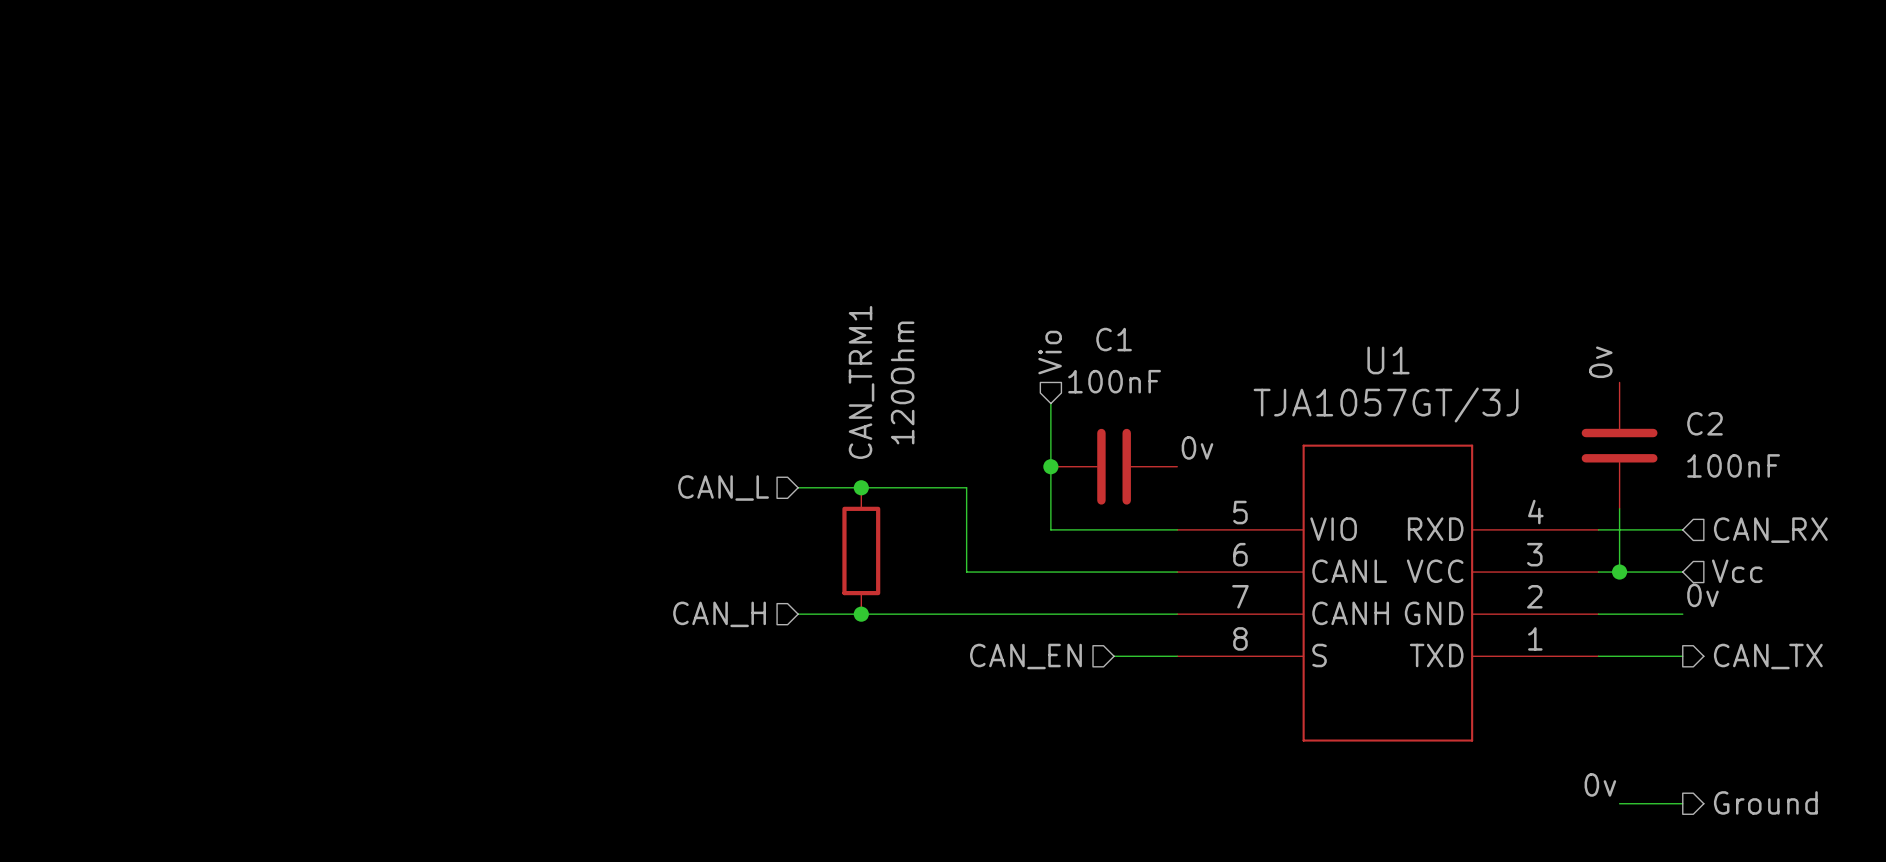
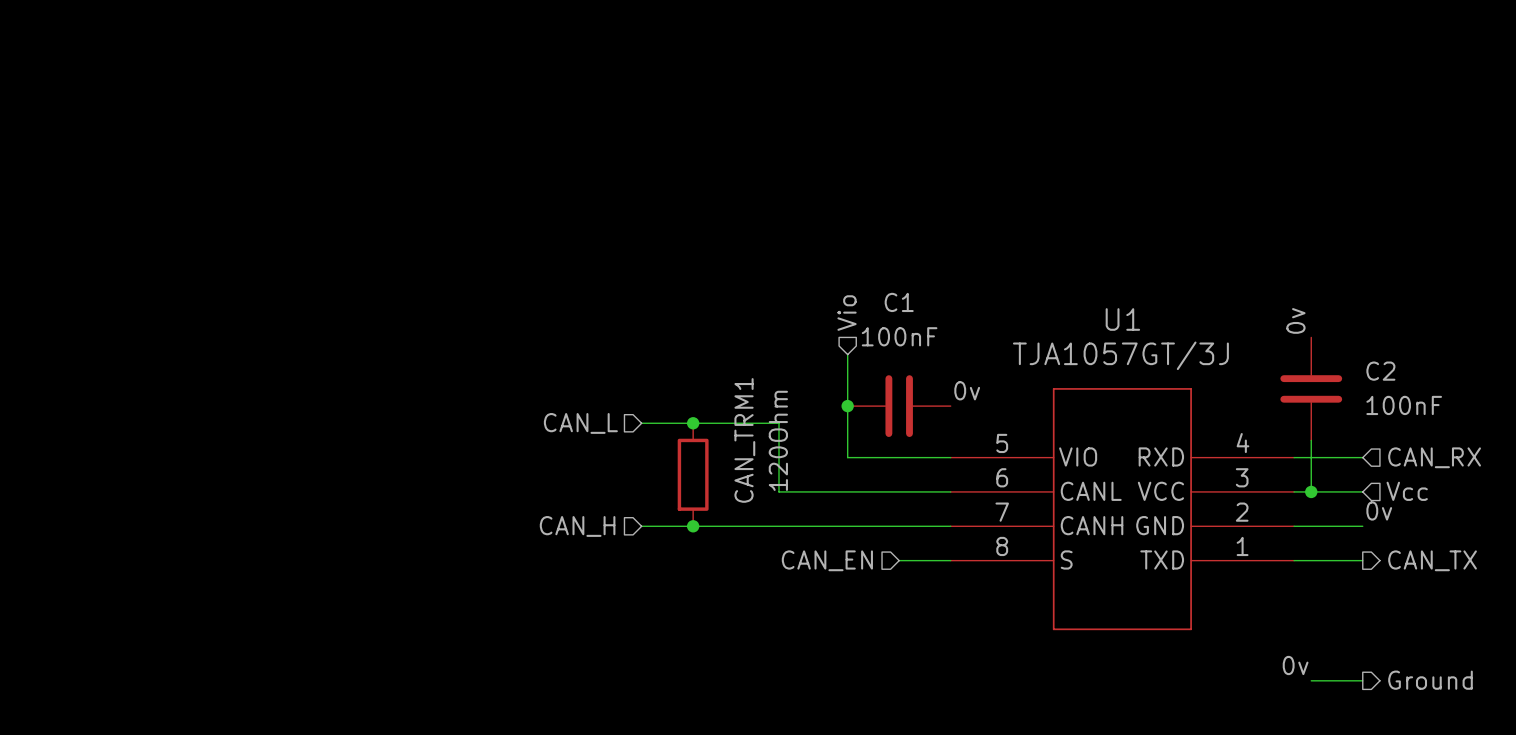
CAN_TRM1 name position: CAN_TRM1 (861, 382) -> CAN_TRM1 (744, 440)
CAN_TRM1 value position: 120Ohm (902, 382) -> 120Ohm (778, 440)

